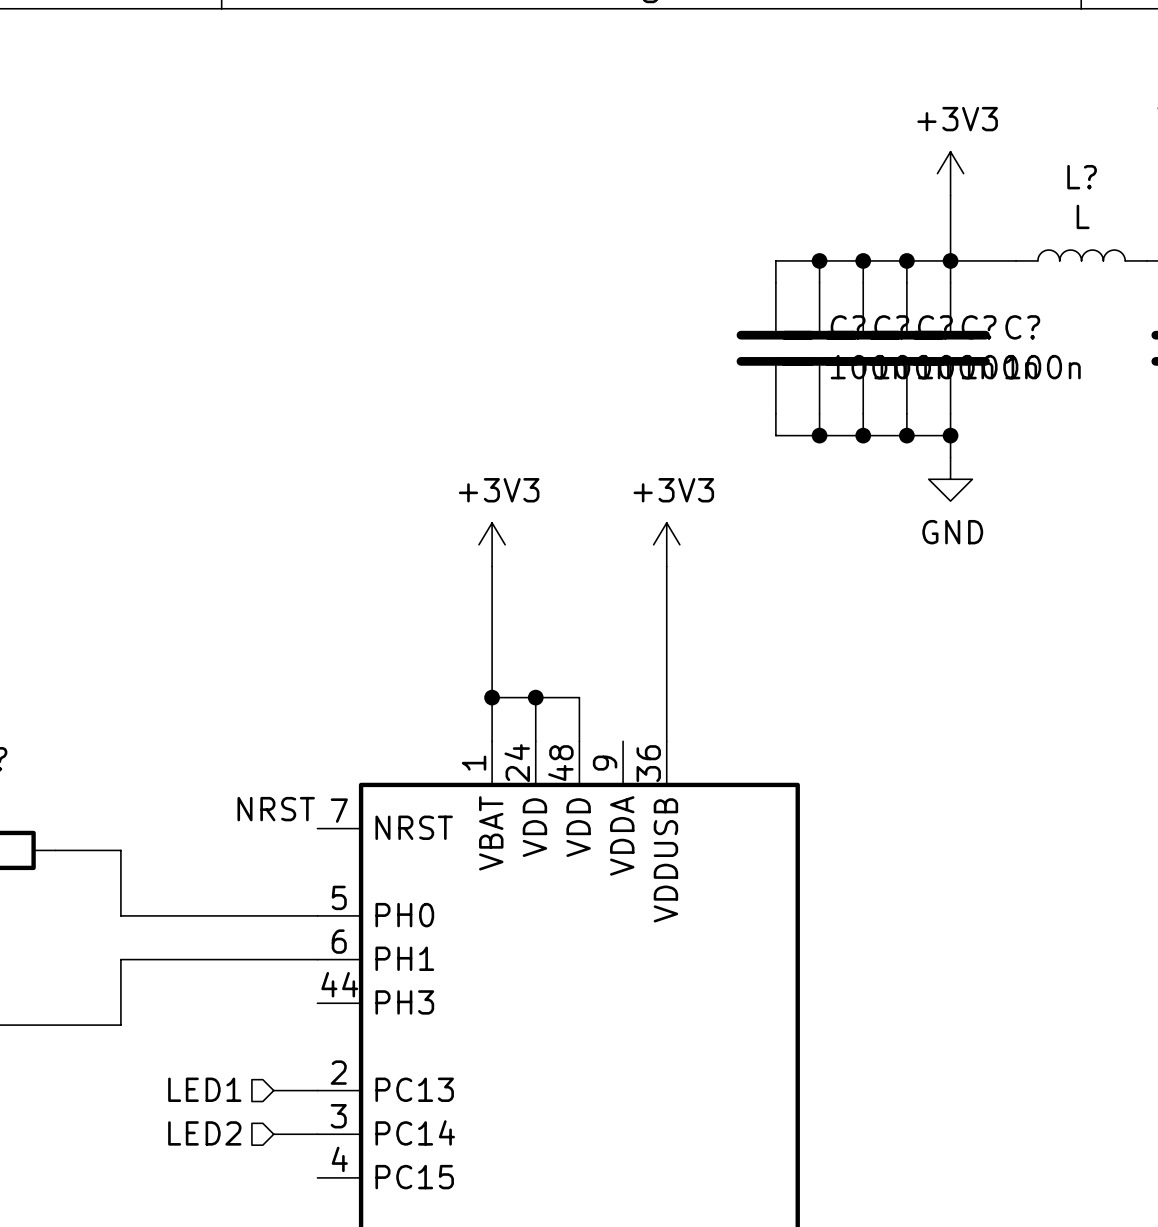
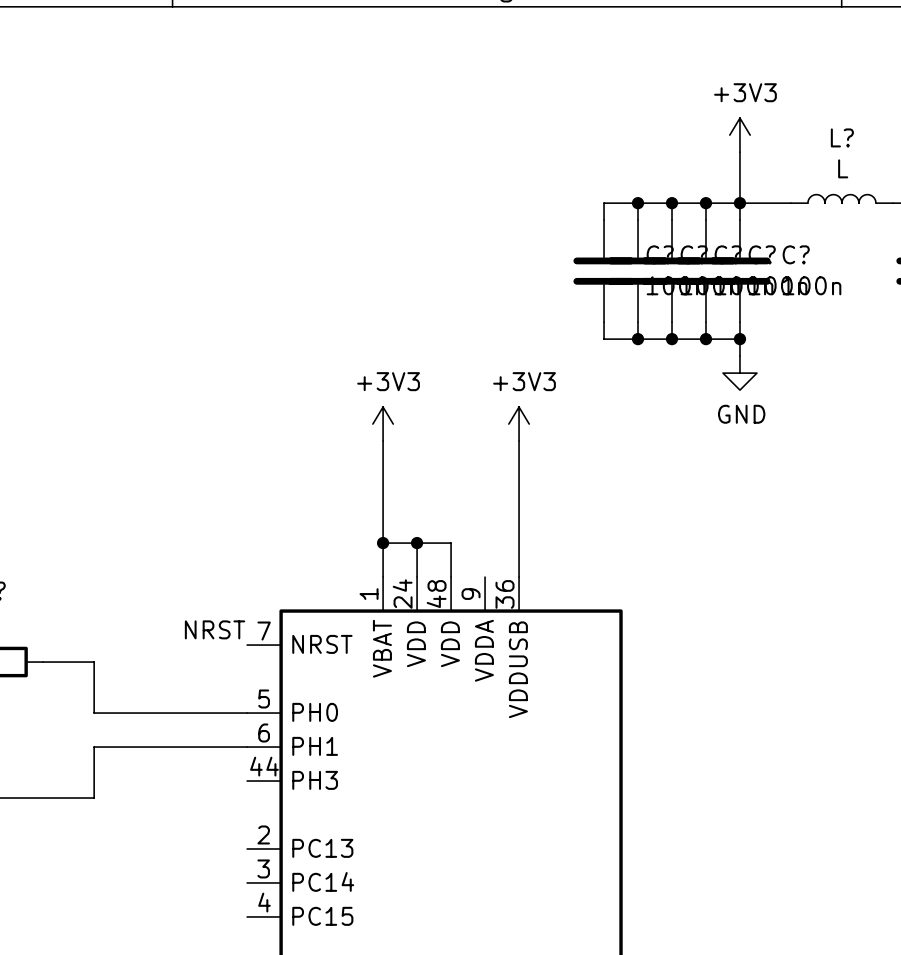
hierarchical label: LED1 (204, 1089) -> none
wire: (273, 1090) (317, 1090) -> none
hierarchical label: LED2 (204, 1133) -> none
wire: (273, 1134) (317, 1134) -> none

